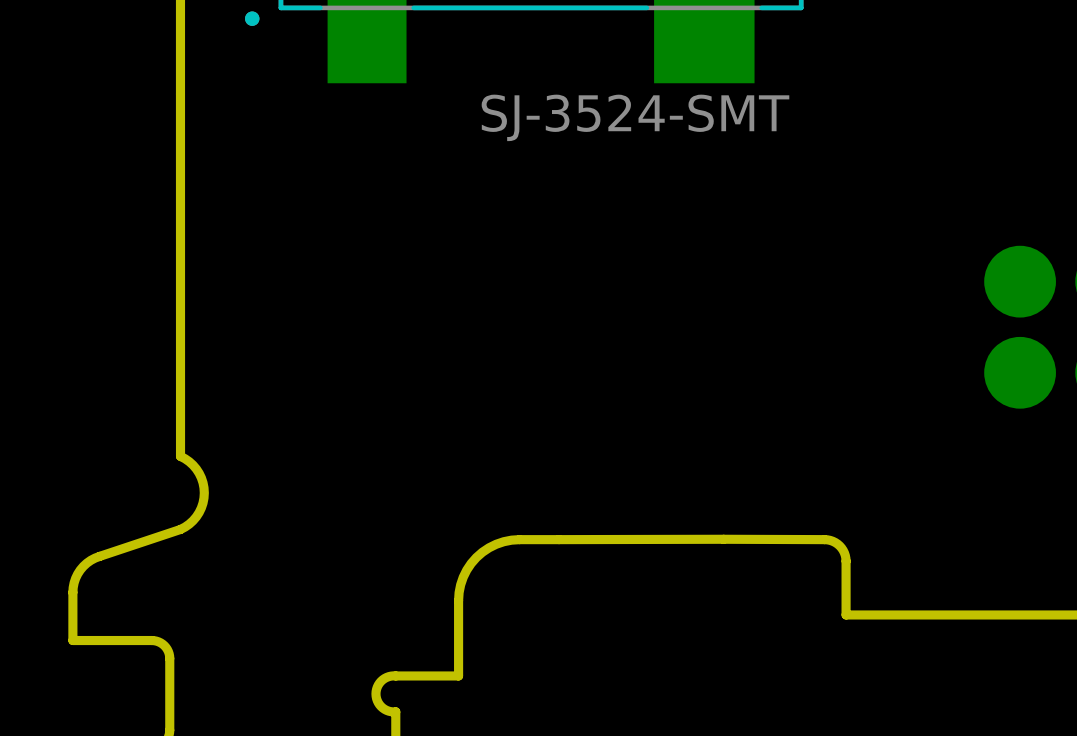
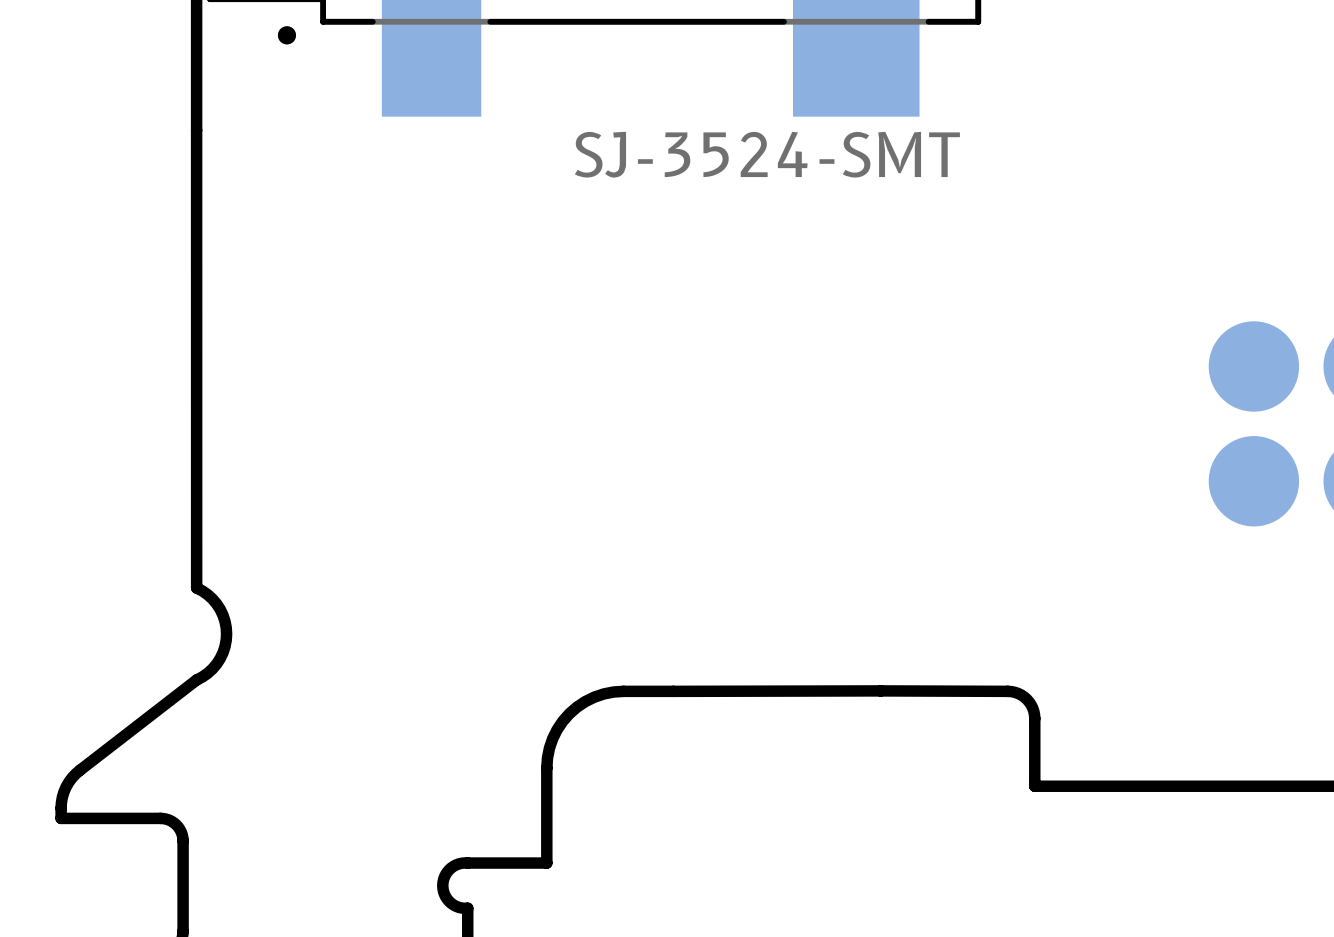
board edge: (180, 94) (180, 456) (193, 465) (201, 477) (204, 492) (203, 503) (196, 516) (185, 527) (95, 558) (83, 566) (75, 578) (73, 587) (72, 632) -> (196, 130) (196, 587) (212, 598) (222, 615) (226, 633) (224, 646) (216, 664) (207, 673) (75, 773) (66, 786) (61, 808)

